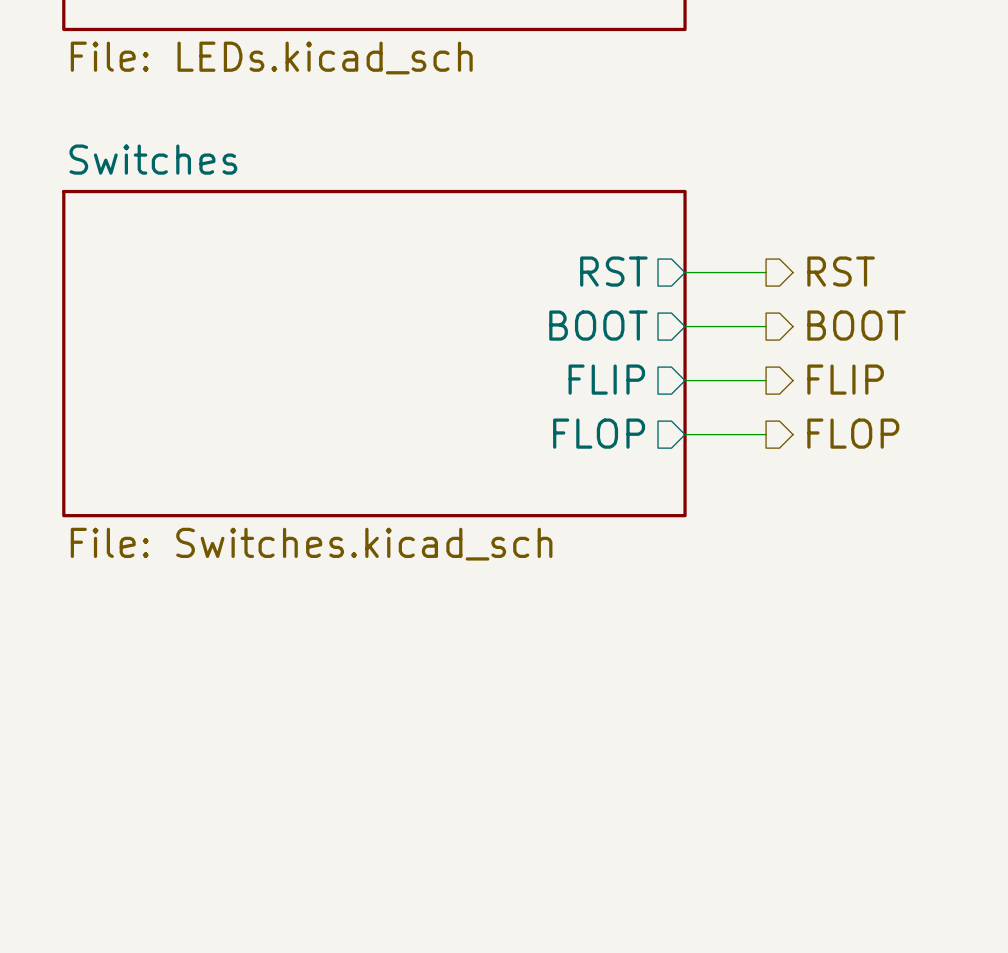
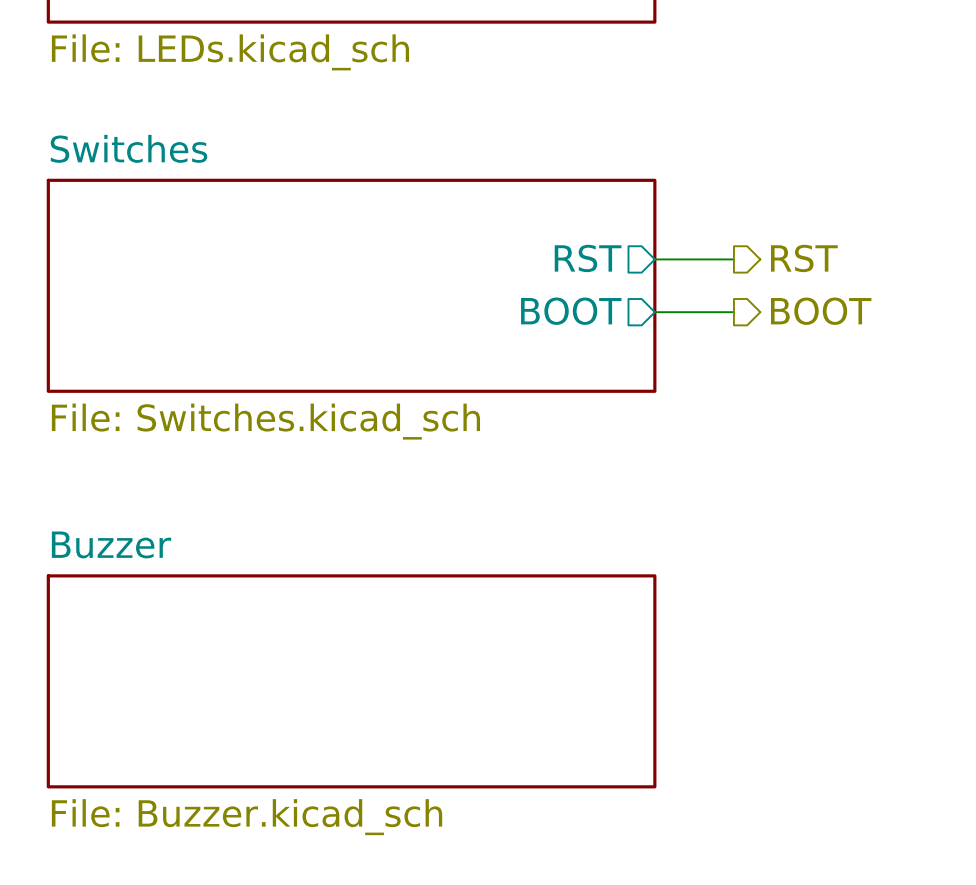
sheet Switches: none -> File: Switches.kicad_sch (351, 285)
sheet Switches: File: Switches.kicad_sch (374, 353) -> none
sheet pin: FLIP (606, 379) -> none
hierarchical label: FLIP (845, 379) -> none
wire: (685, 380) (766, 380) -> none
sheet pin: FLOP (599, 433) -> none
hierarchical label: FLOP (853, 433) -> none
wire: (685, 434) (766, 434) -> none
sheet Buzzer: none -> File: Buzzer.kicad_sch (351, 681)

